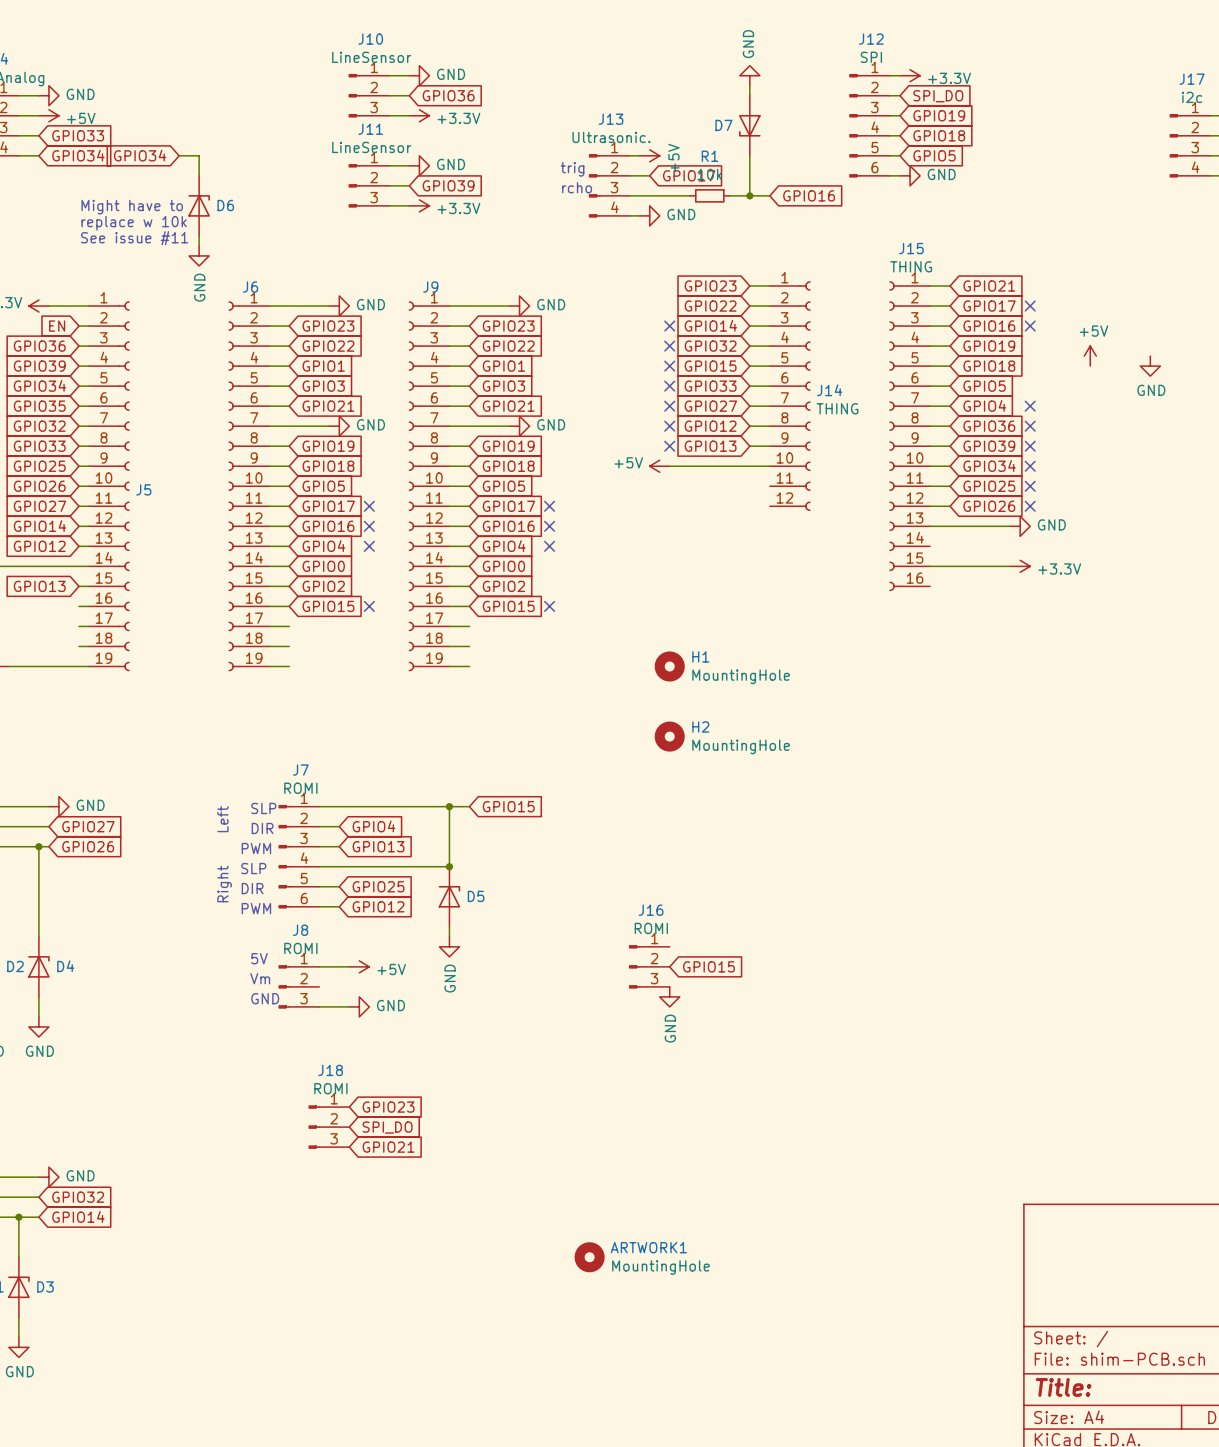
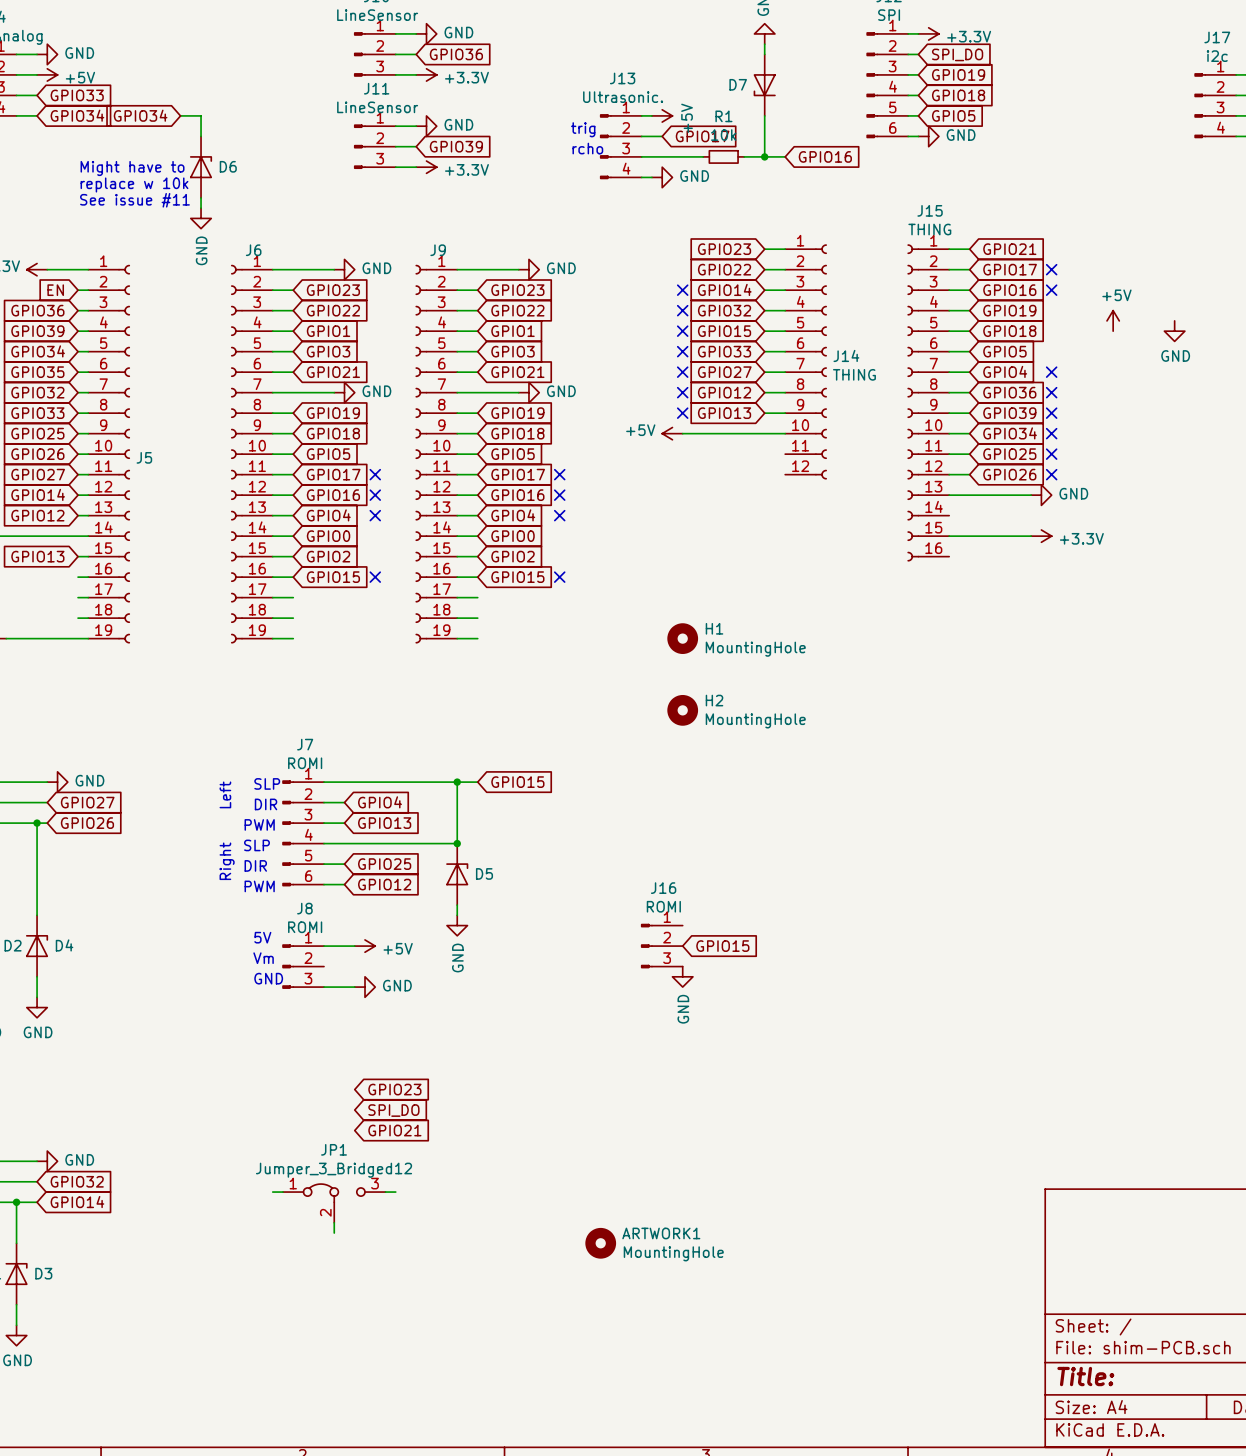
J18: ROMI (328, 1127) -> none
wire: none -> (272, 1192) (283, 1192)
wire: none -> (385, 1192) (395, 1192)
JP1: none -> Jumper_3_Bridged12 (334, 1203)
wire: none -> (334, 1222) (334, 1233)

